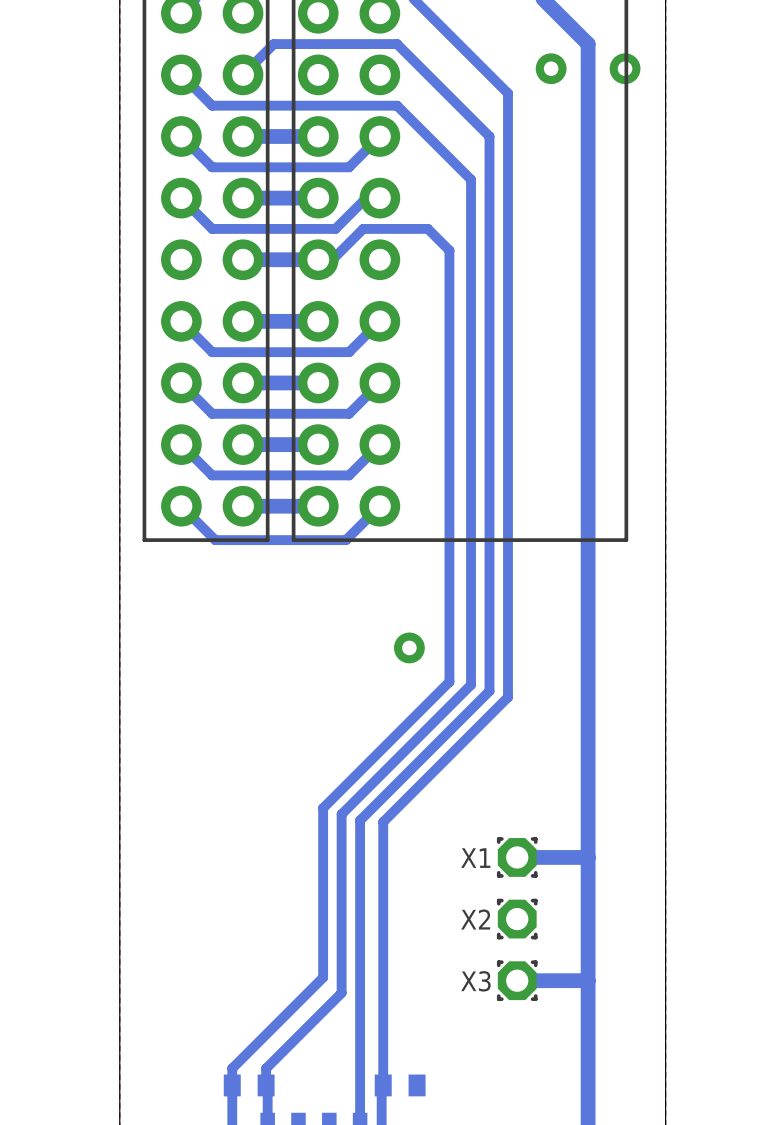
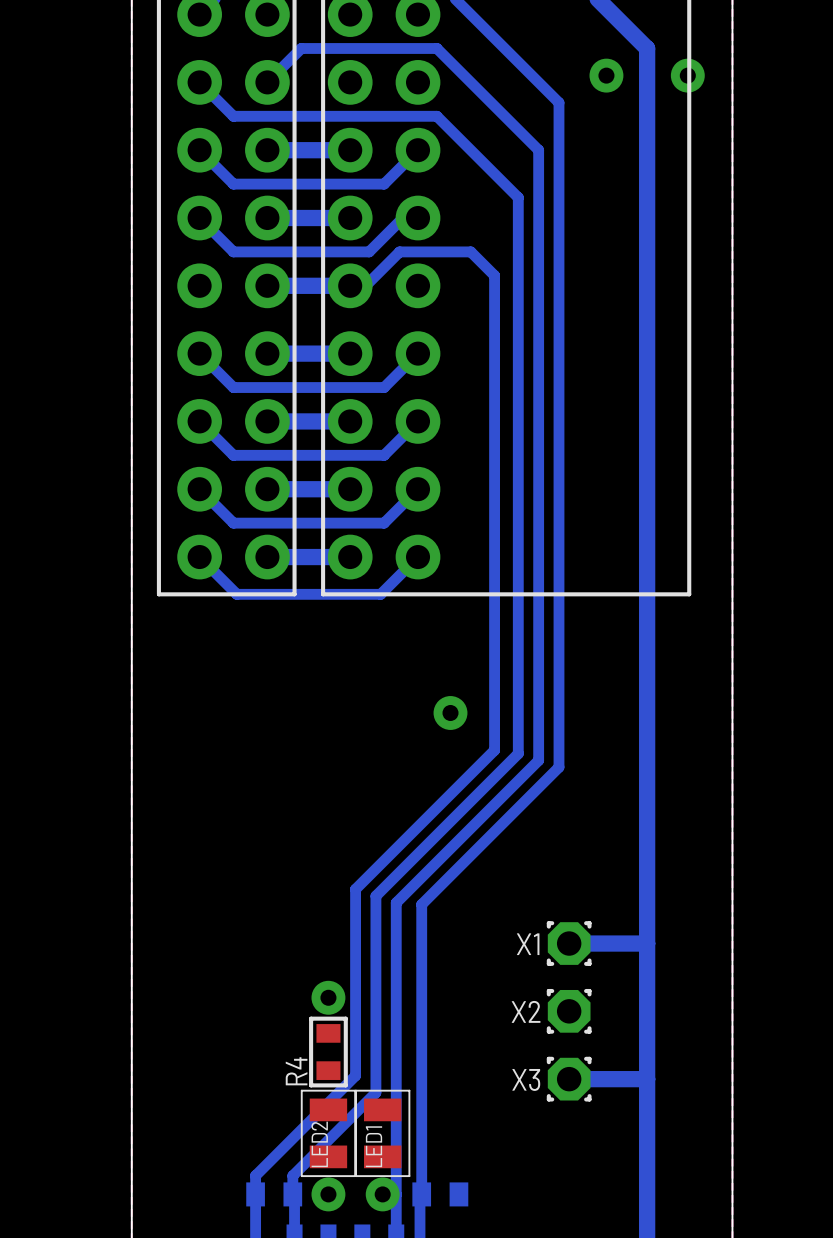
via: none -> (328, 997)
R4: none -> (328, 1052)
LED2: none -> (328, 1133)
LED1: none -> (382, 1133)
via: none -> (328, 1194)
via: none -> (382, 1194)

